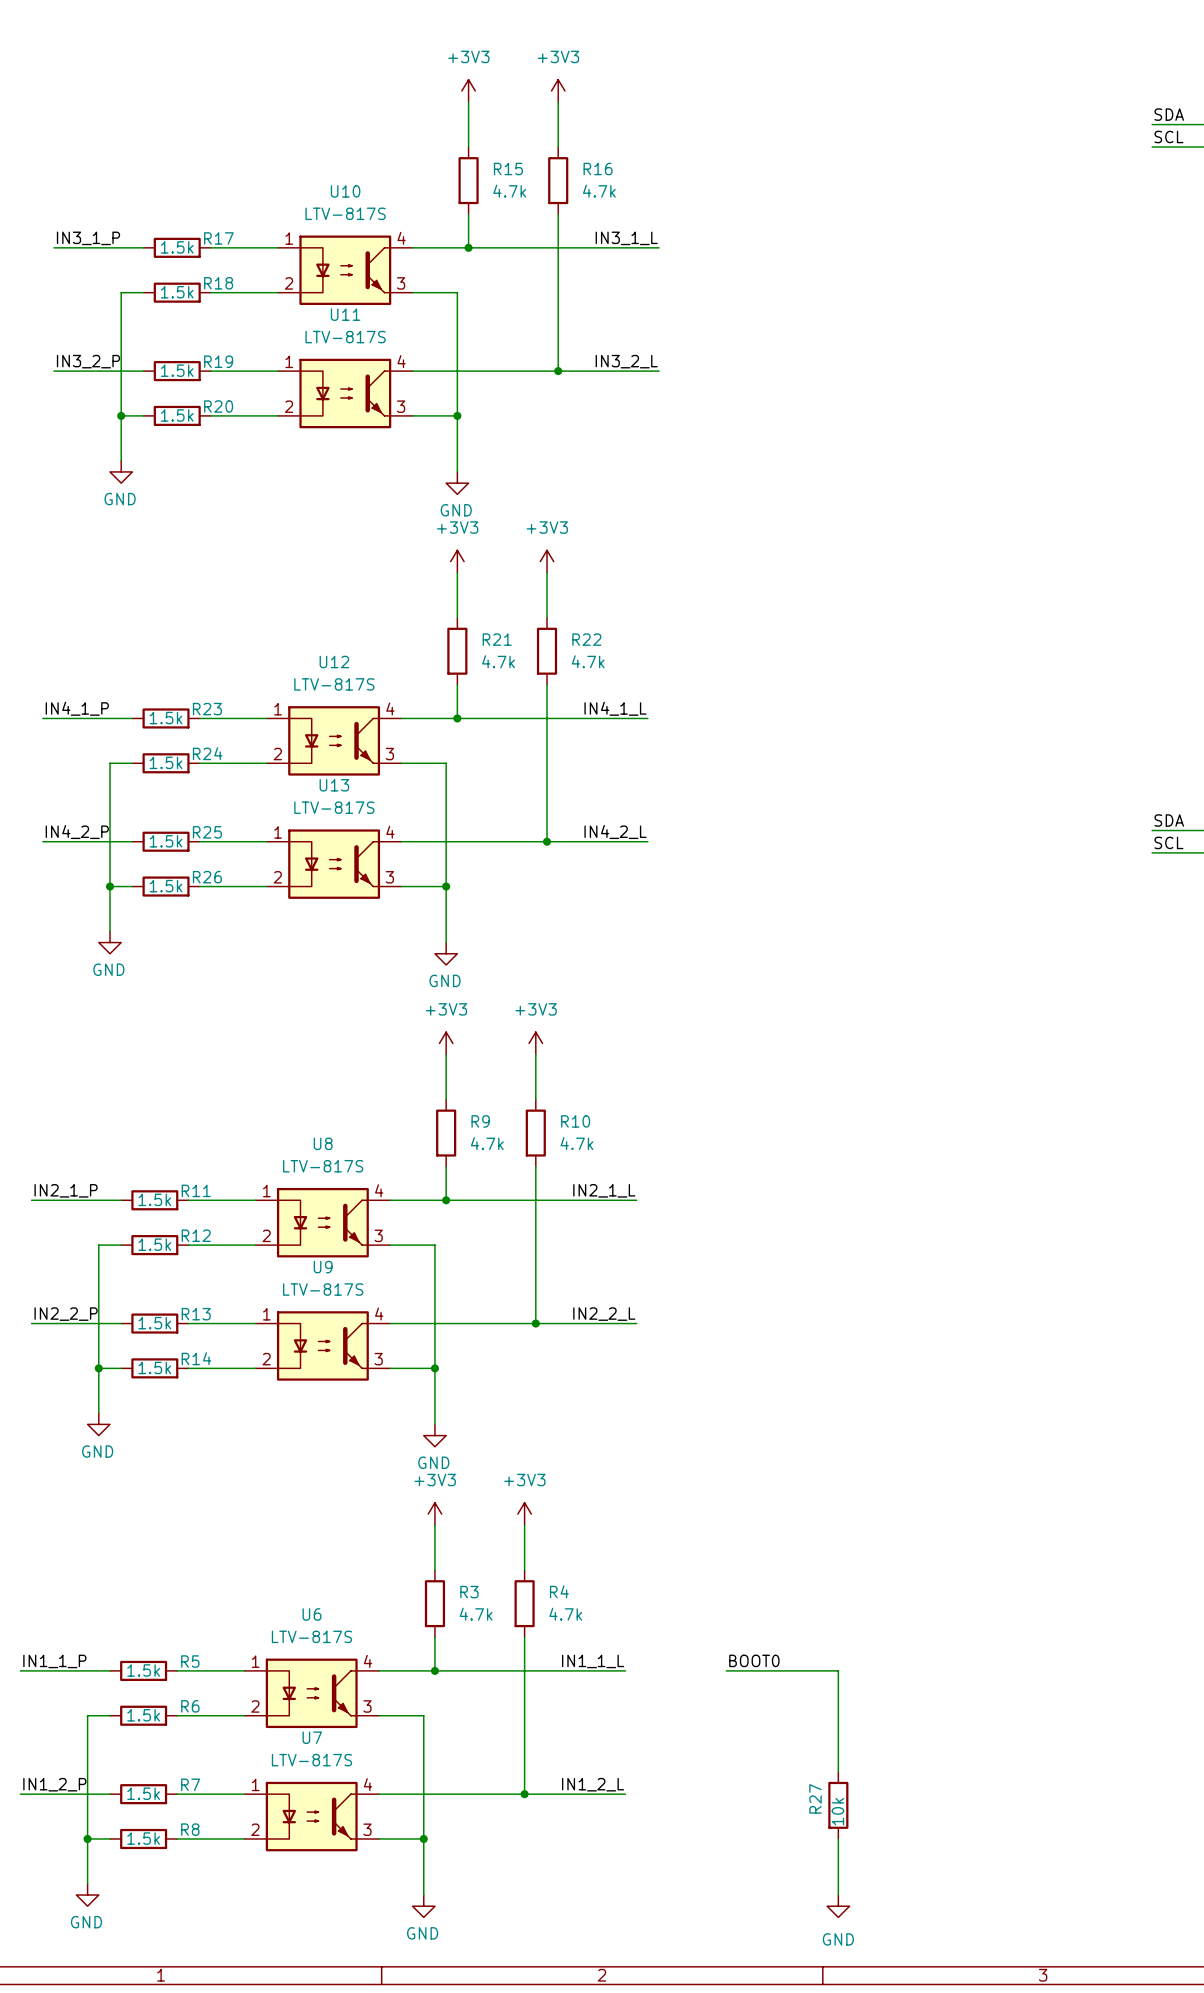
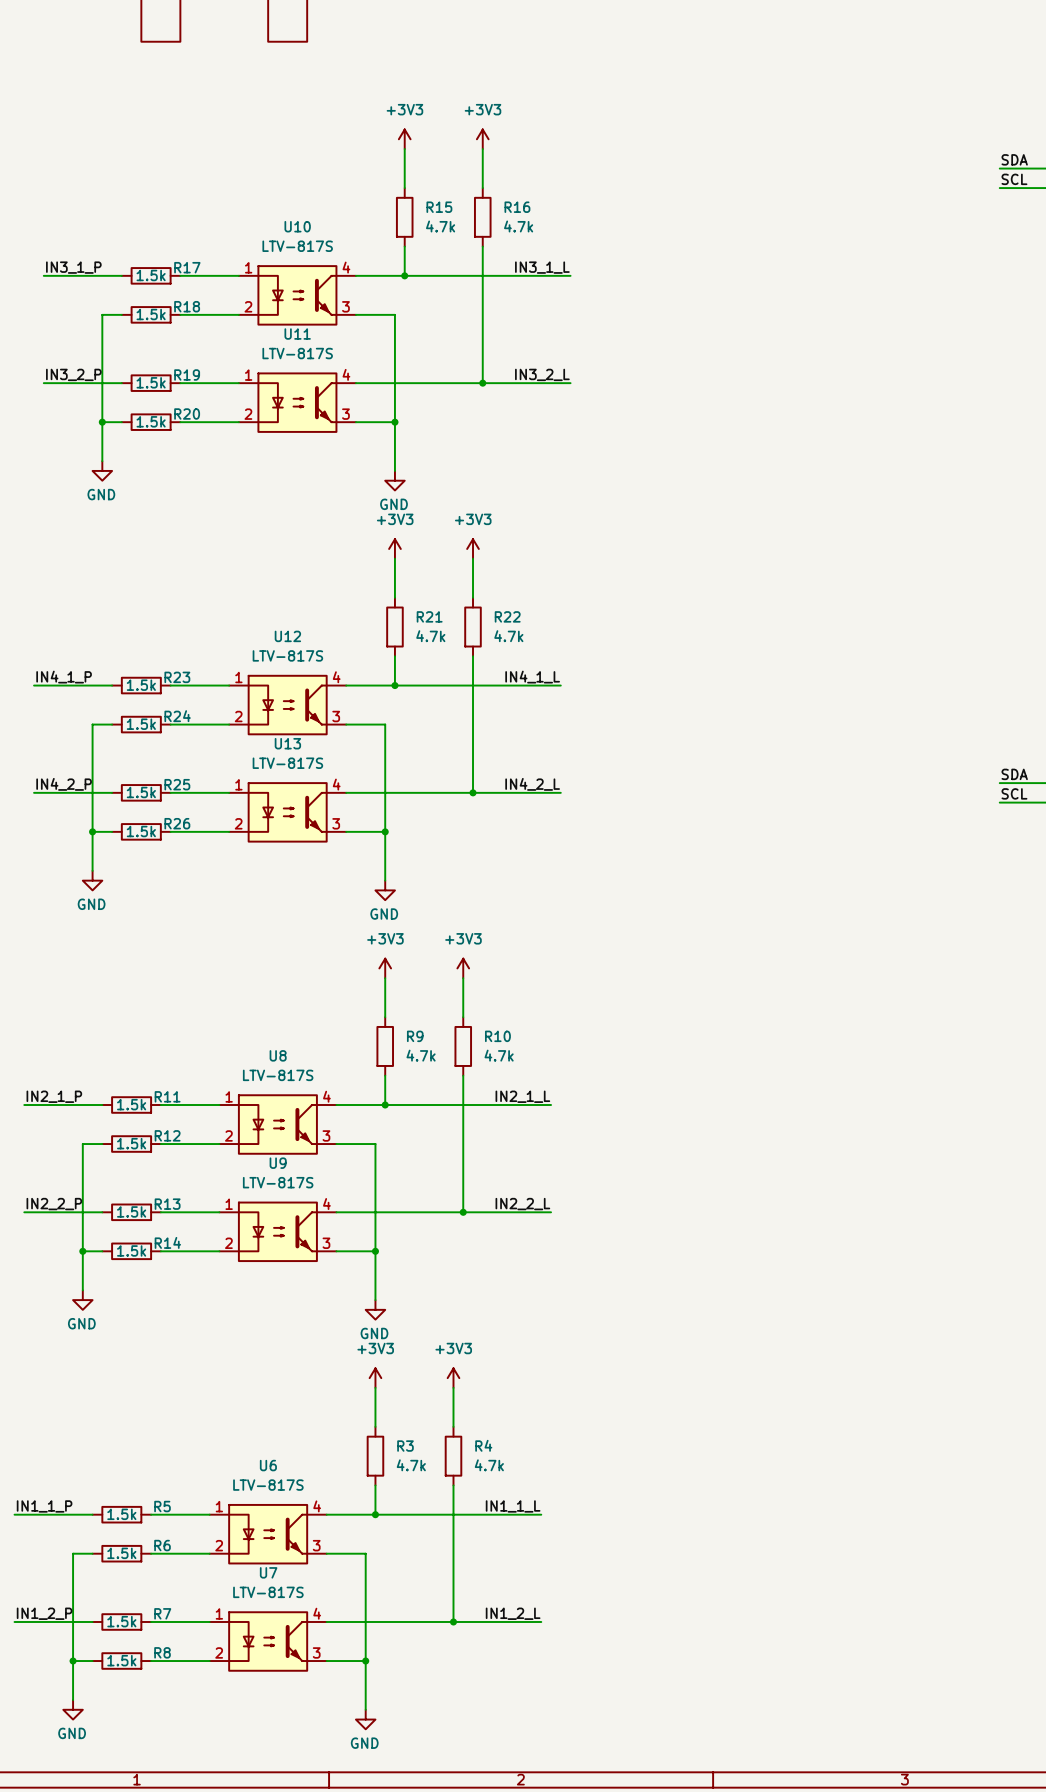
label: BOOT0 (754, 1660) -> none
wire: (726, 1670) (838, 1670) (838, 1771) -> none
R27: (838, 1805) -> none
wire: (838, 1838) (838, 1895) -> none
power symbol: GND (838, 1906) -> none

